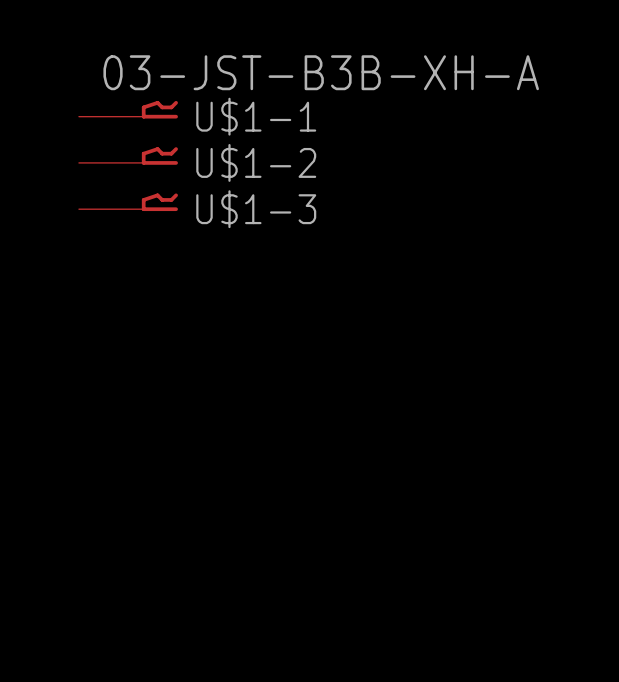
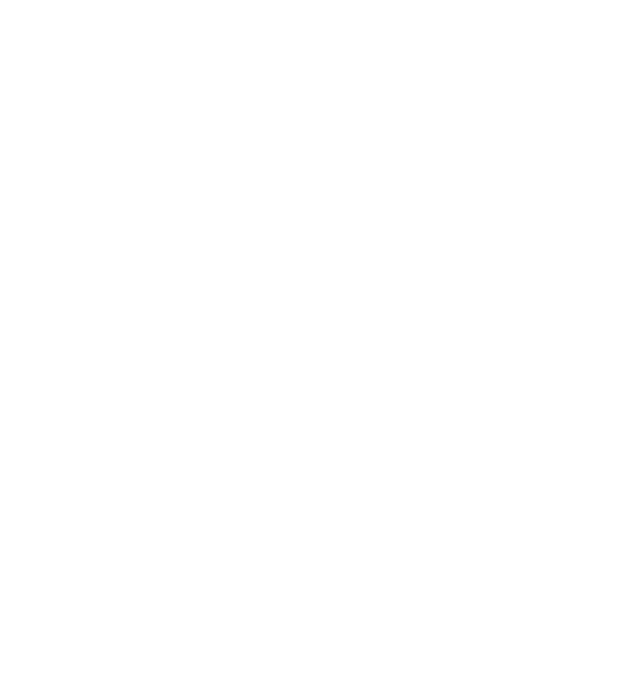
U$1-1: 03-JST-B3B-XH-A (128, 109) -> none
U$1-2: (128, 155) -> none
U$1-3: (128, 202) -> none

